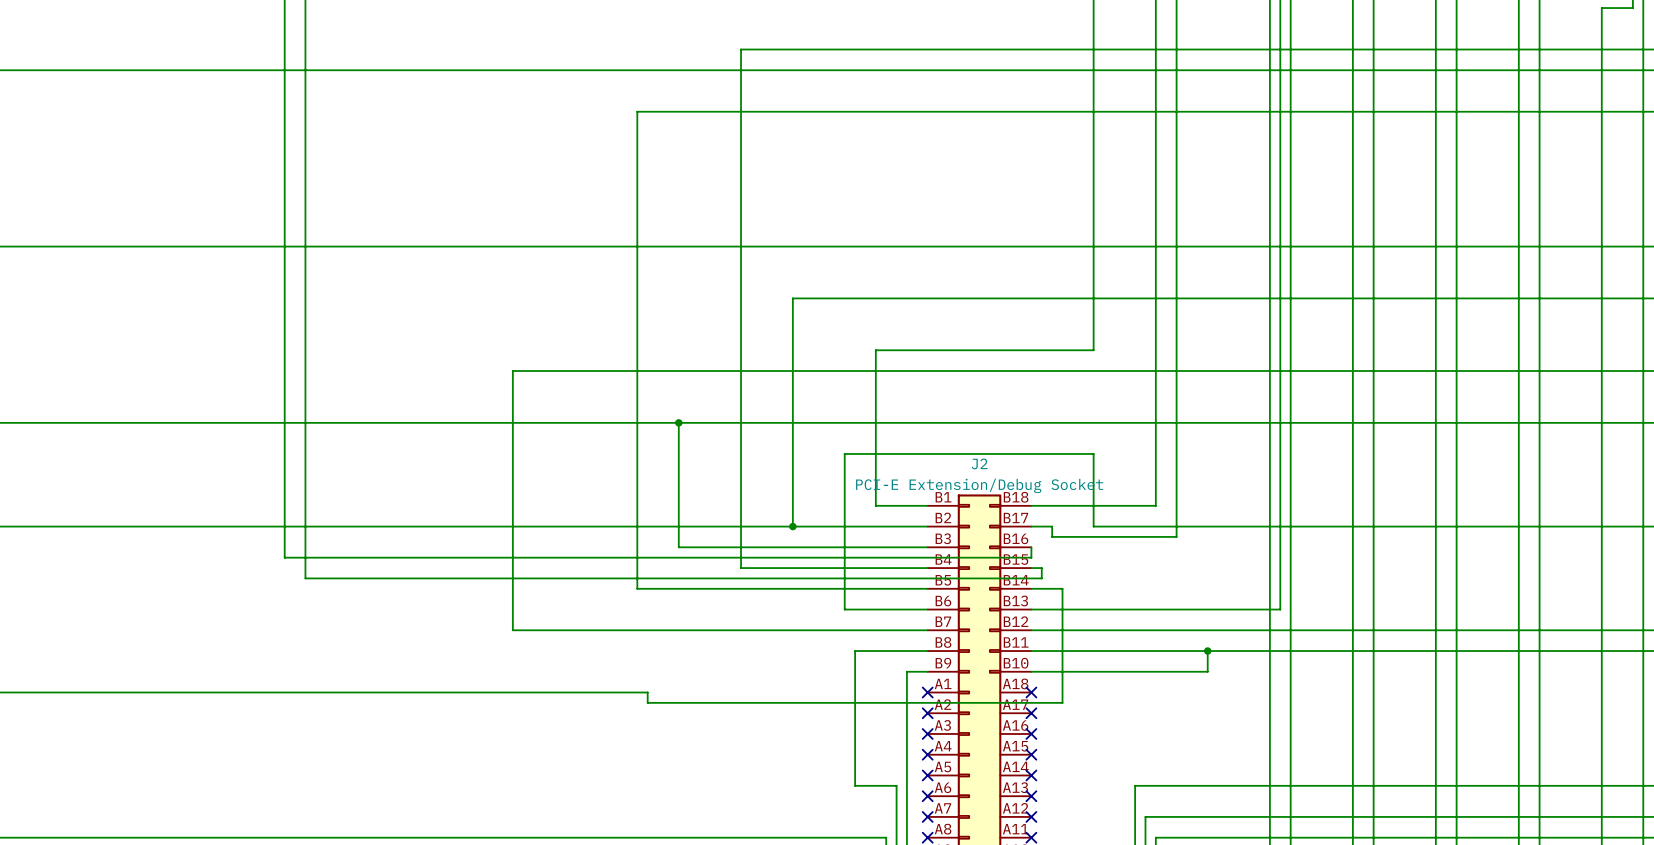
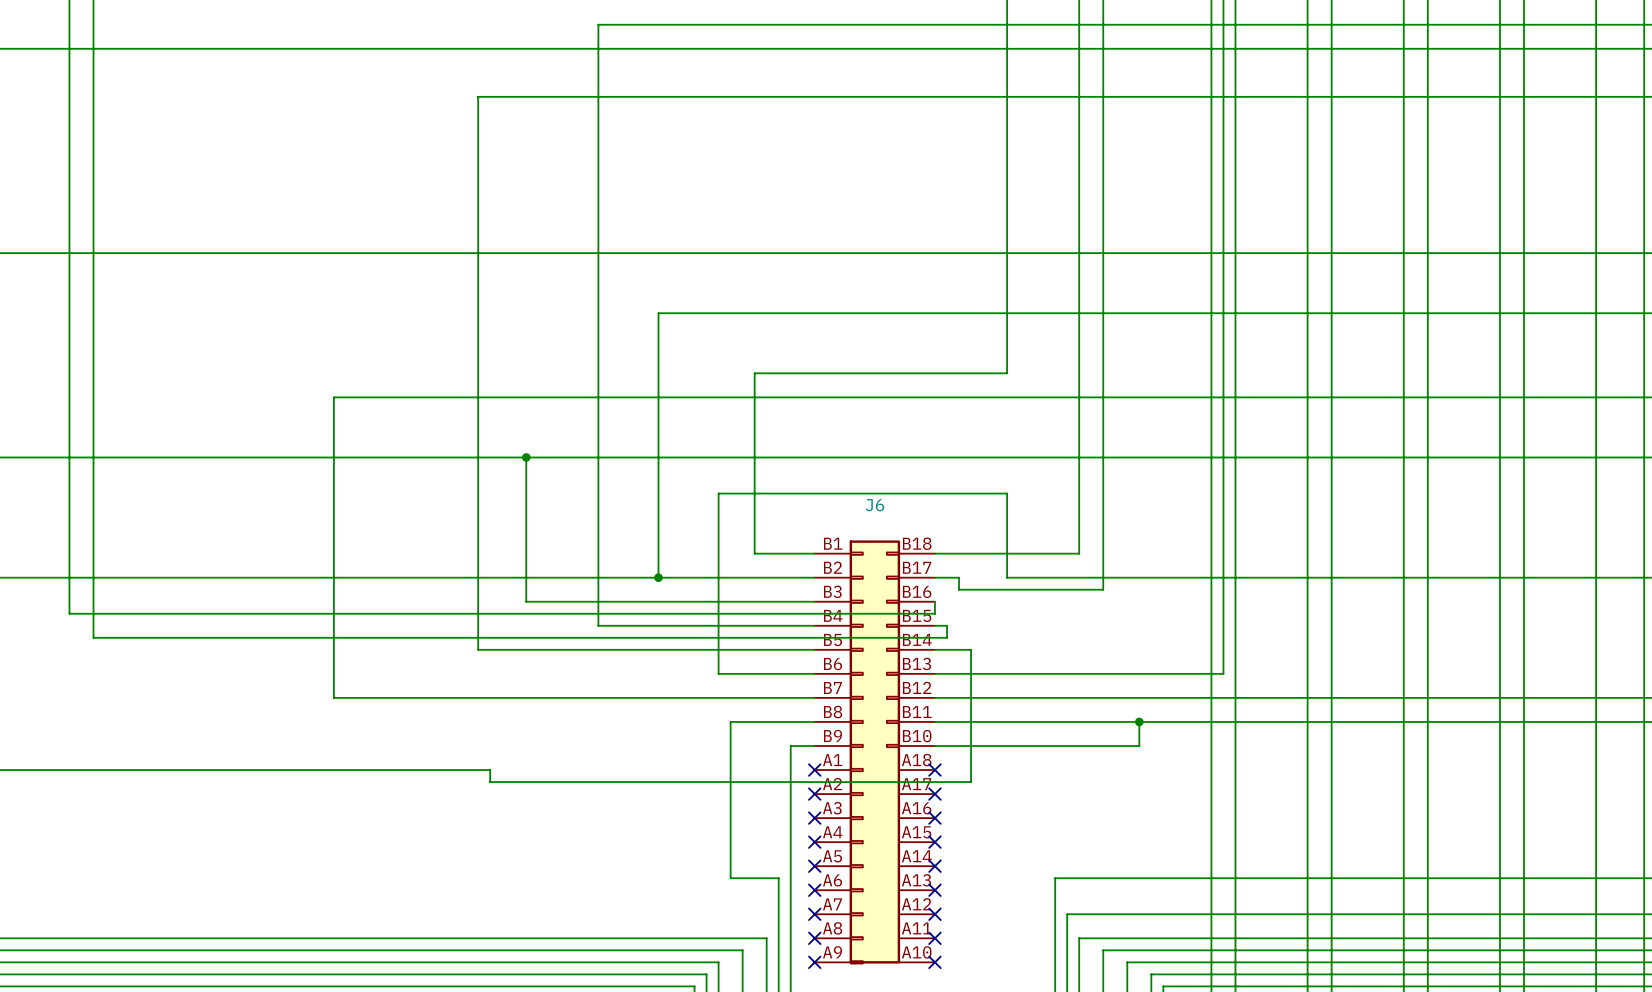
J2 name: J2 (979, 463) -> J6 (874, 505)
J2 value: PCI-E Extension/Debug Socket (979, 485) -> none

